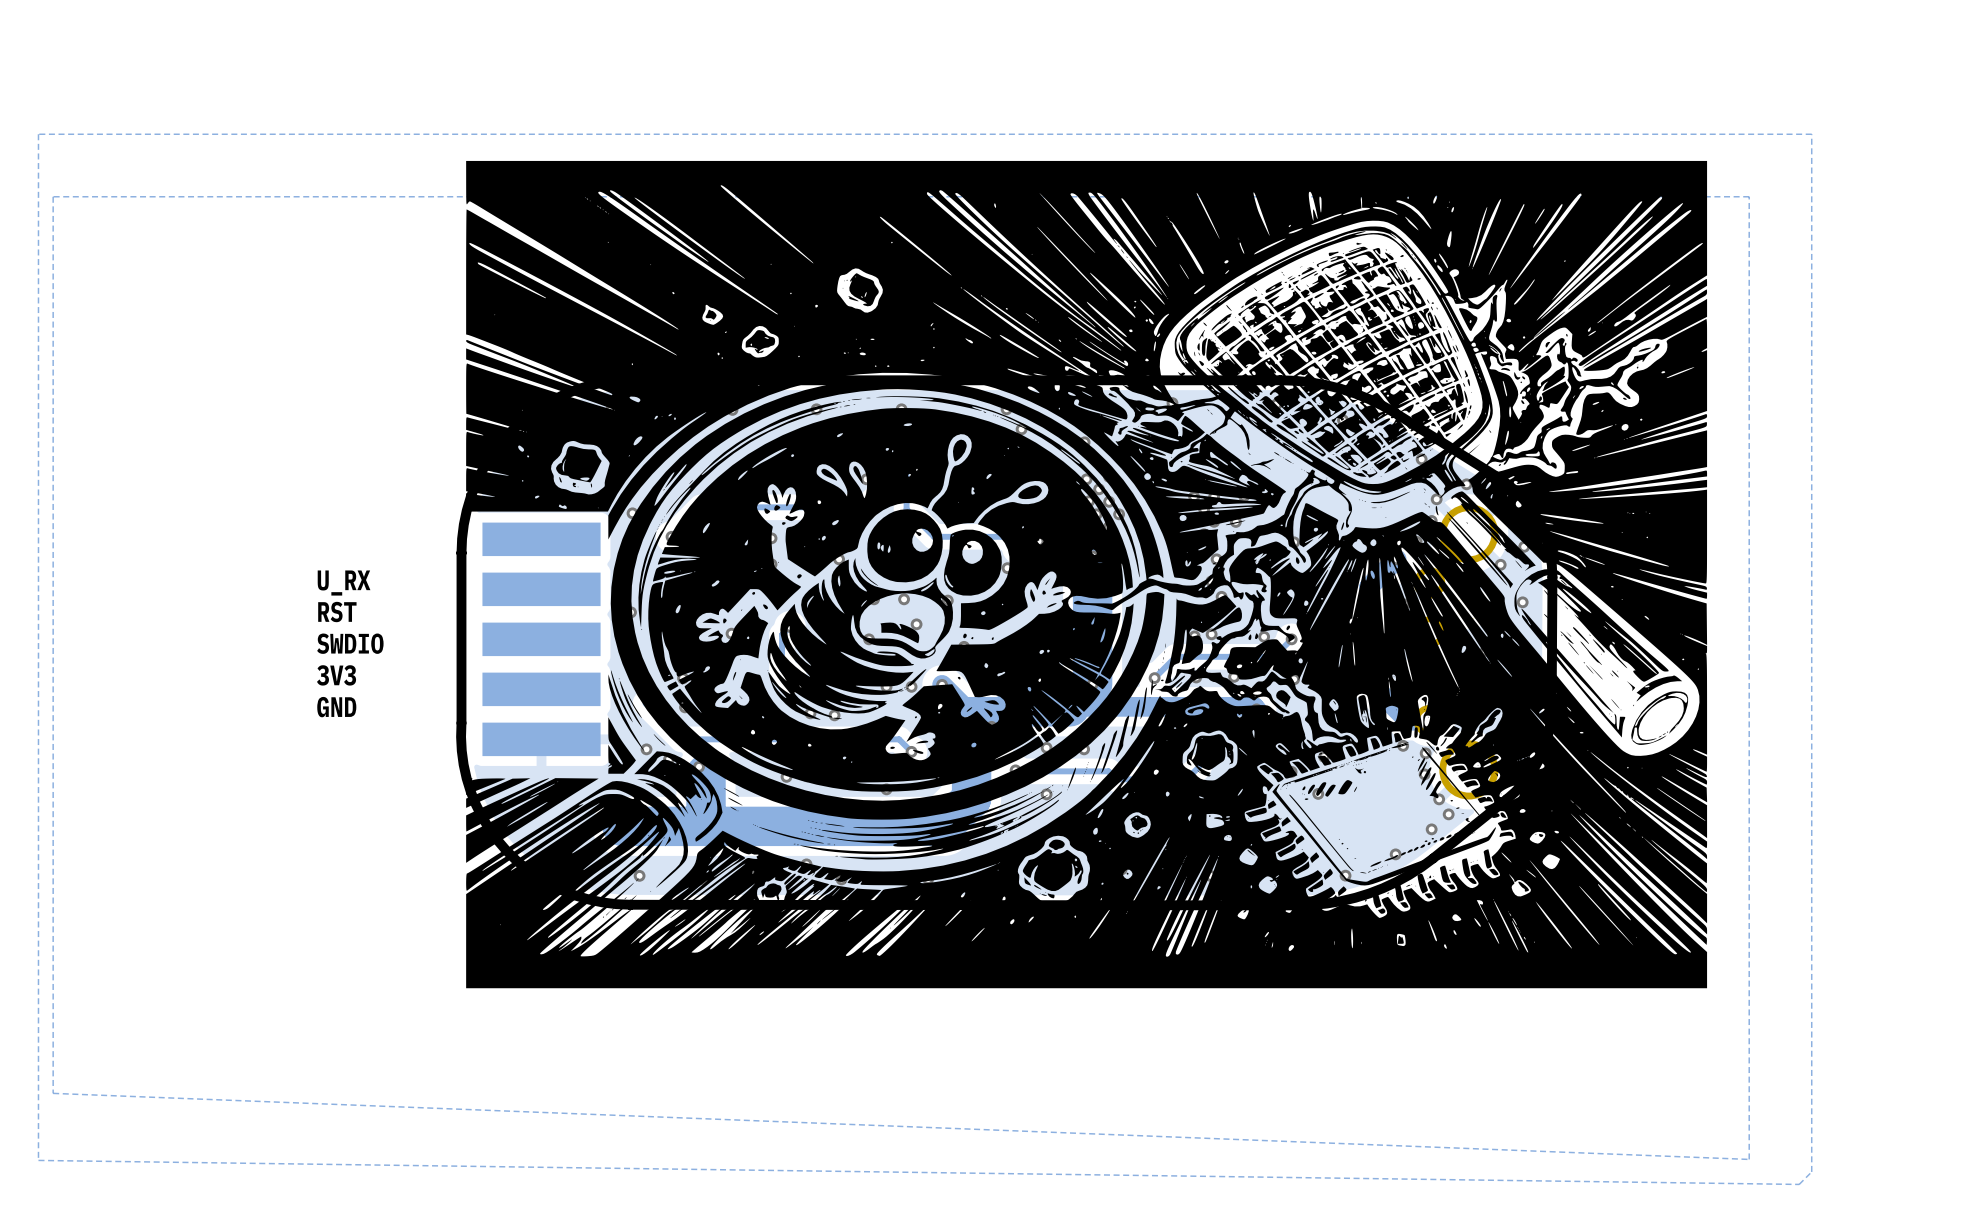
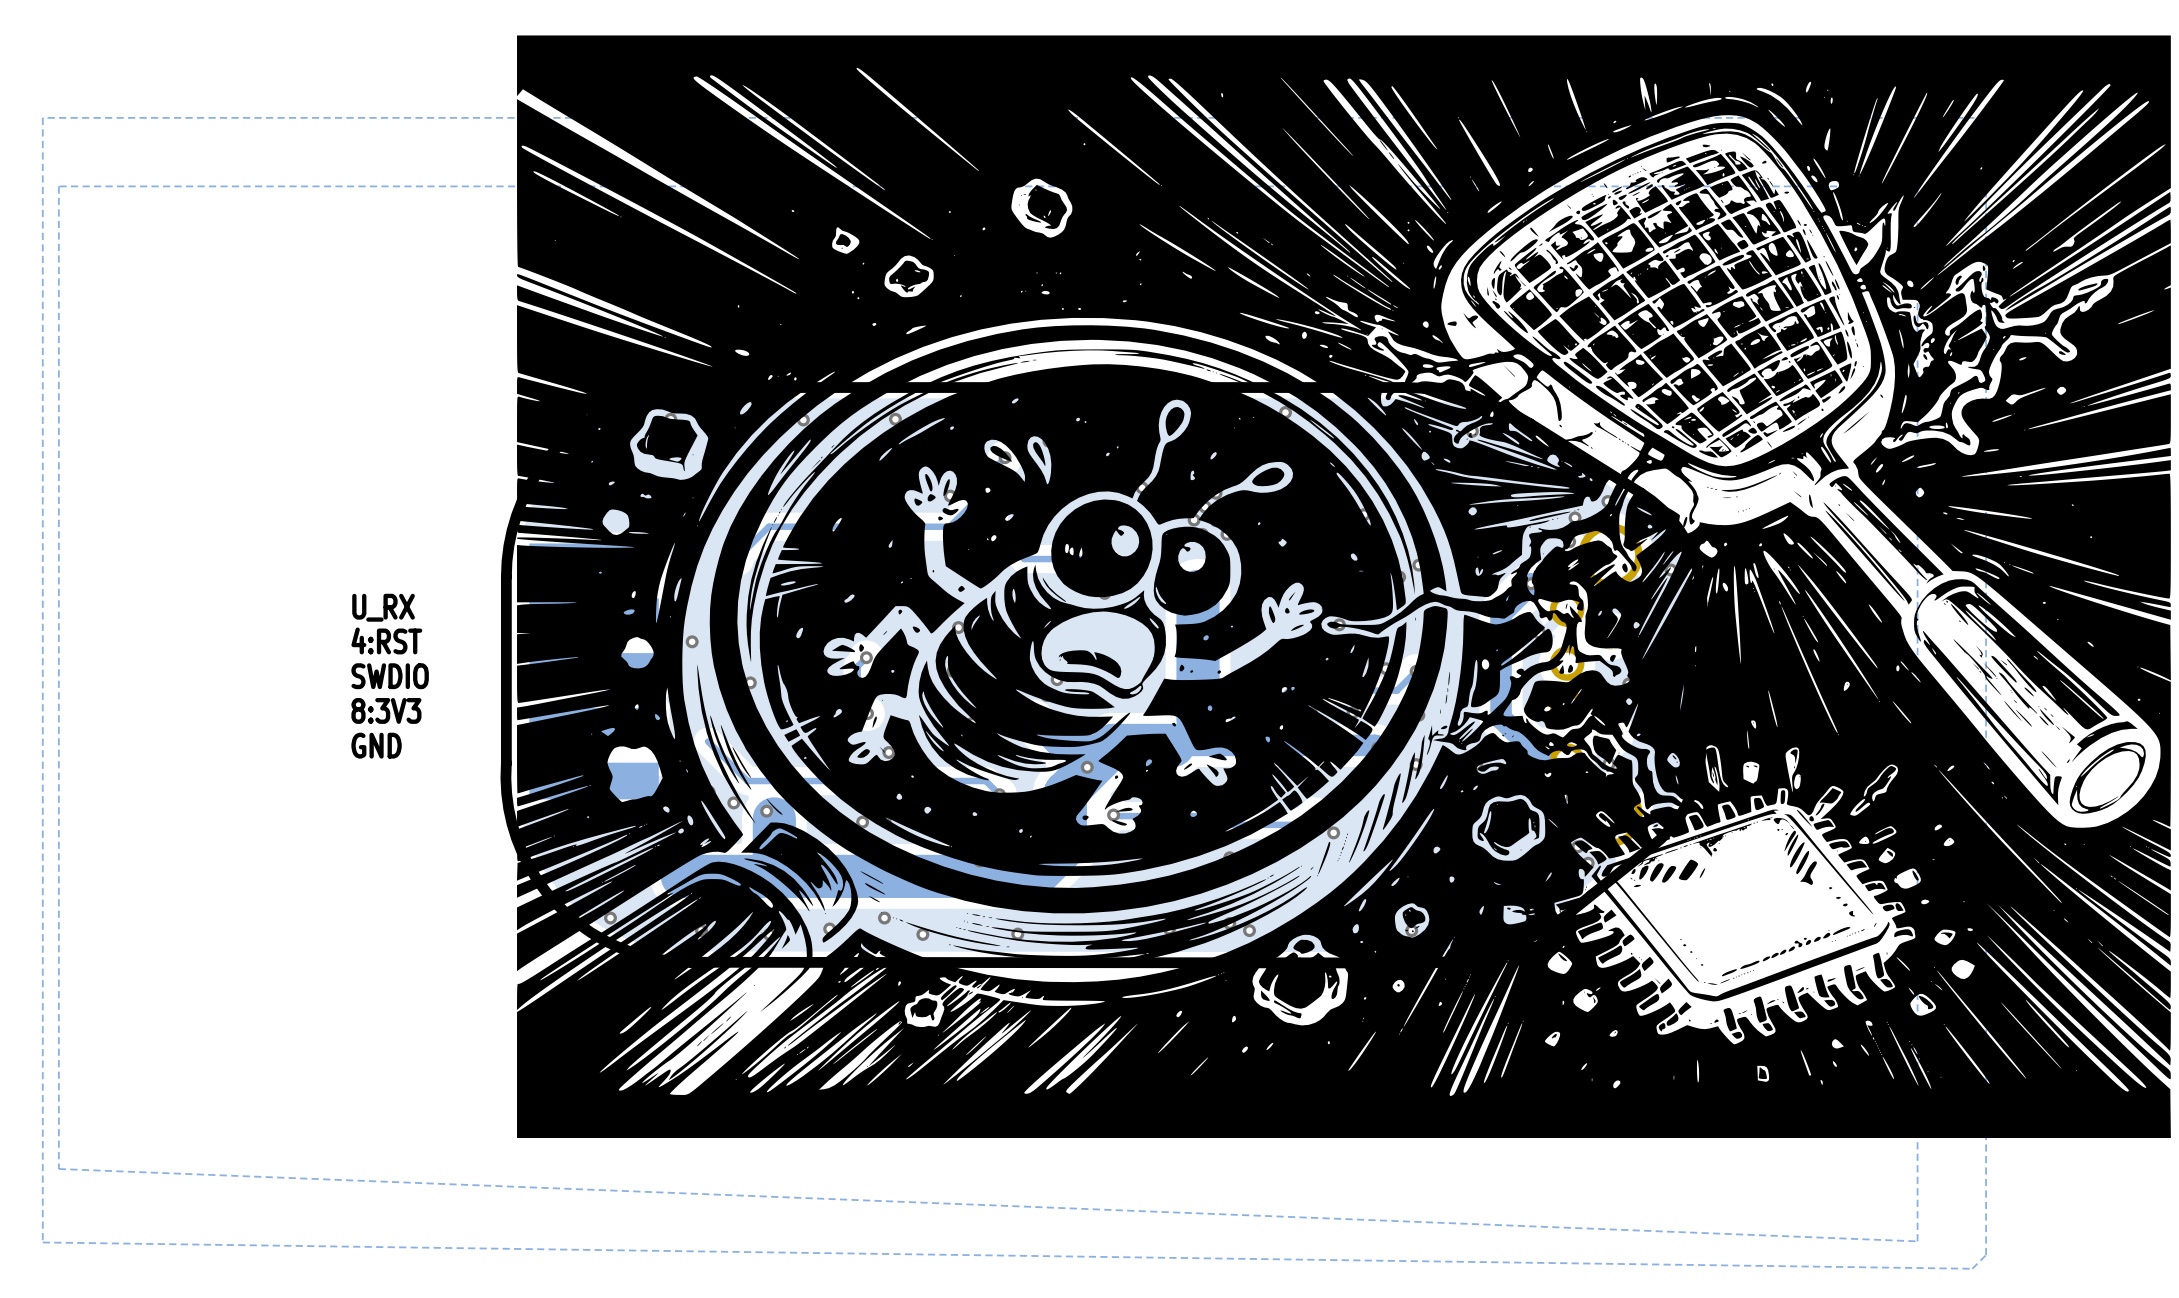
drawing: none -> [516, 35, 2171, 1138]
drawing: [466, 160, 1708, 989] -> none
text: RST (337, 612) -> 4:RST (386, 640)
text: 3V3 (336, 675) -> 8:3V3 (386, 710)

